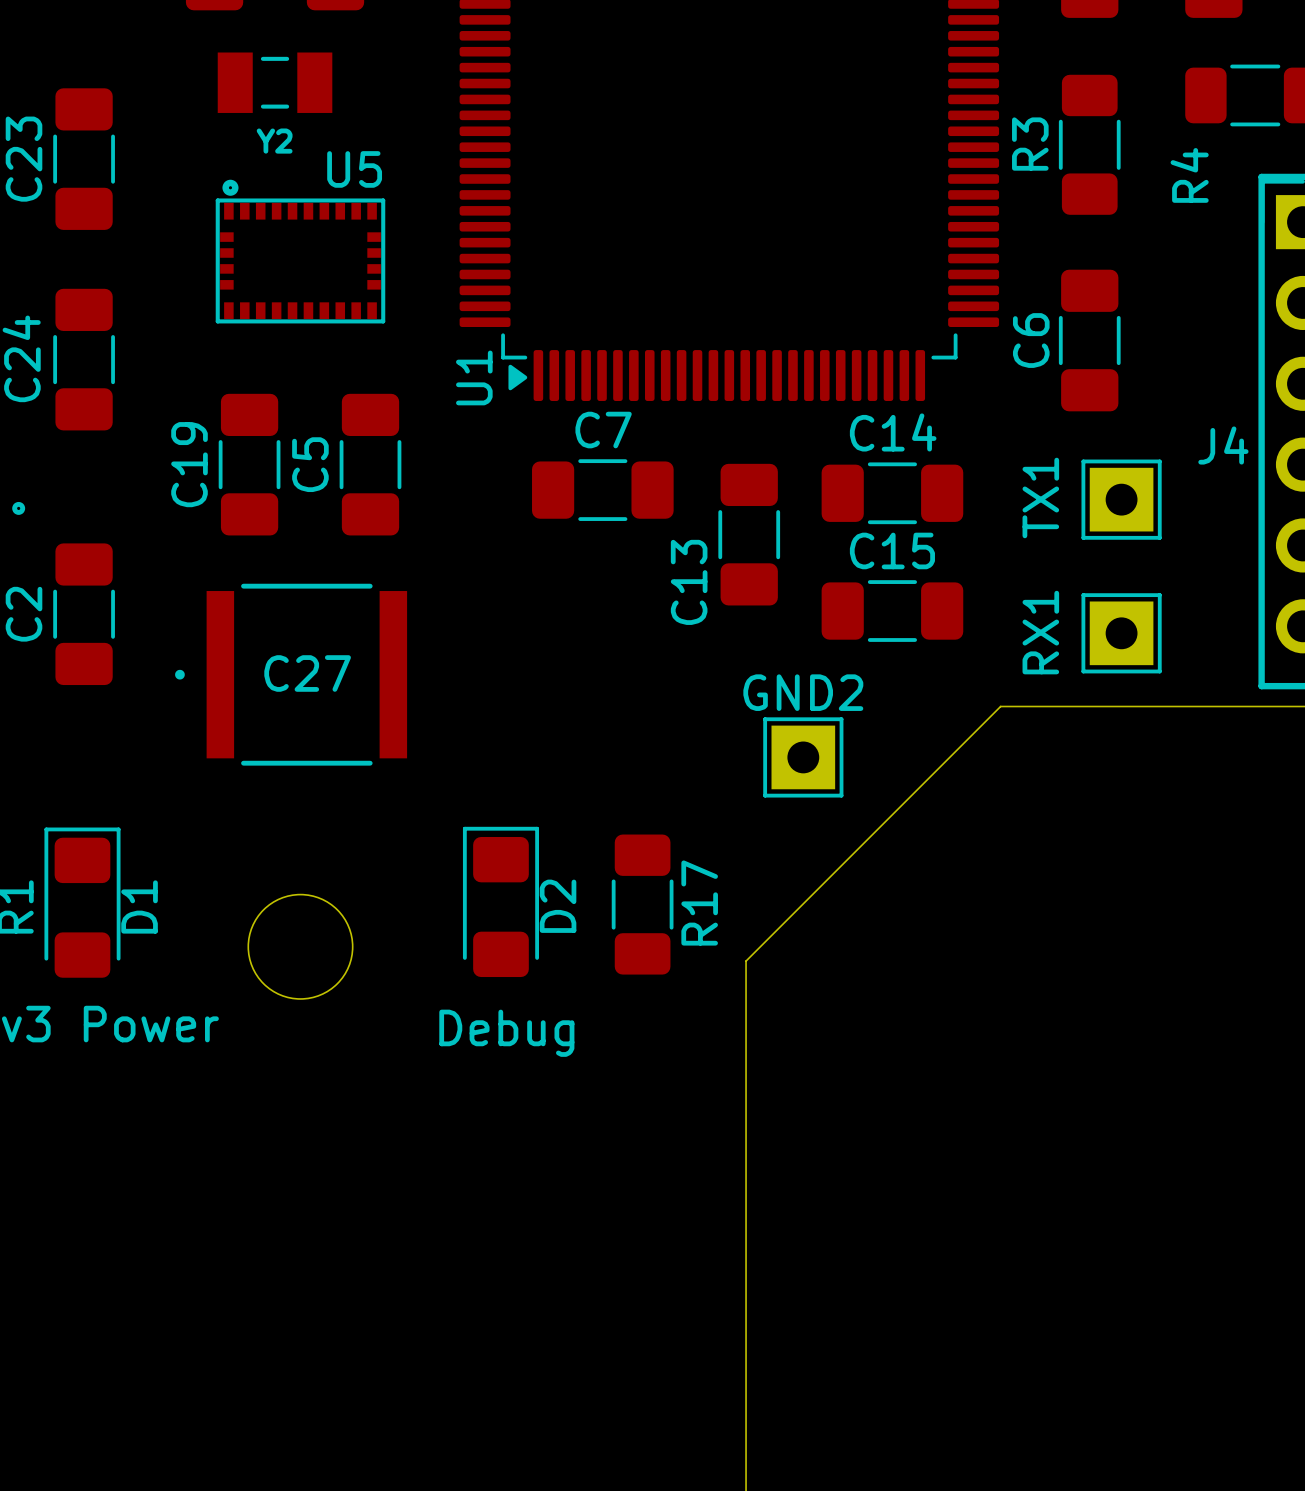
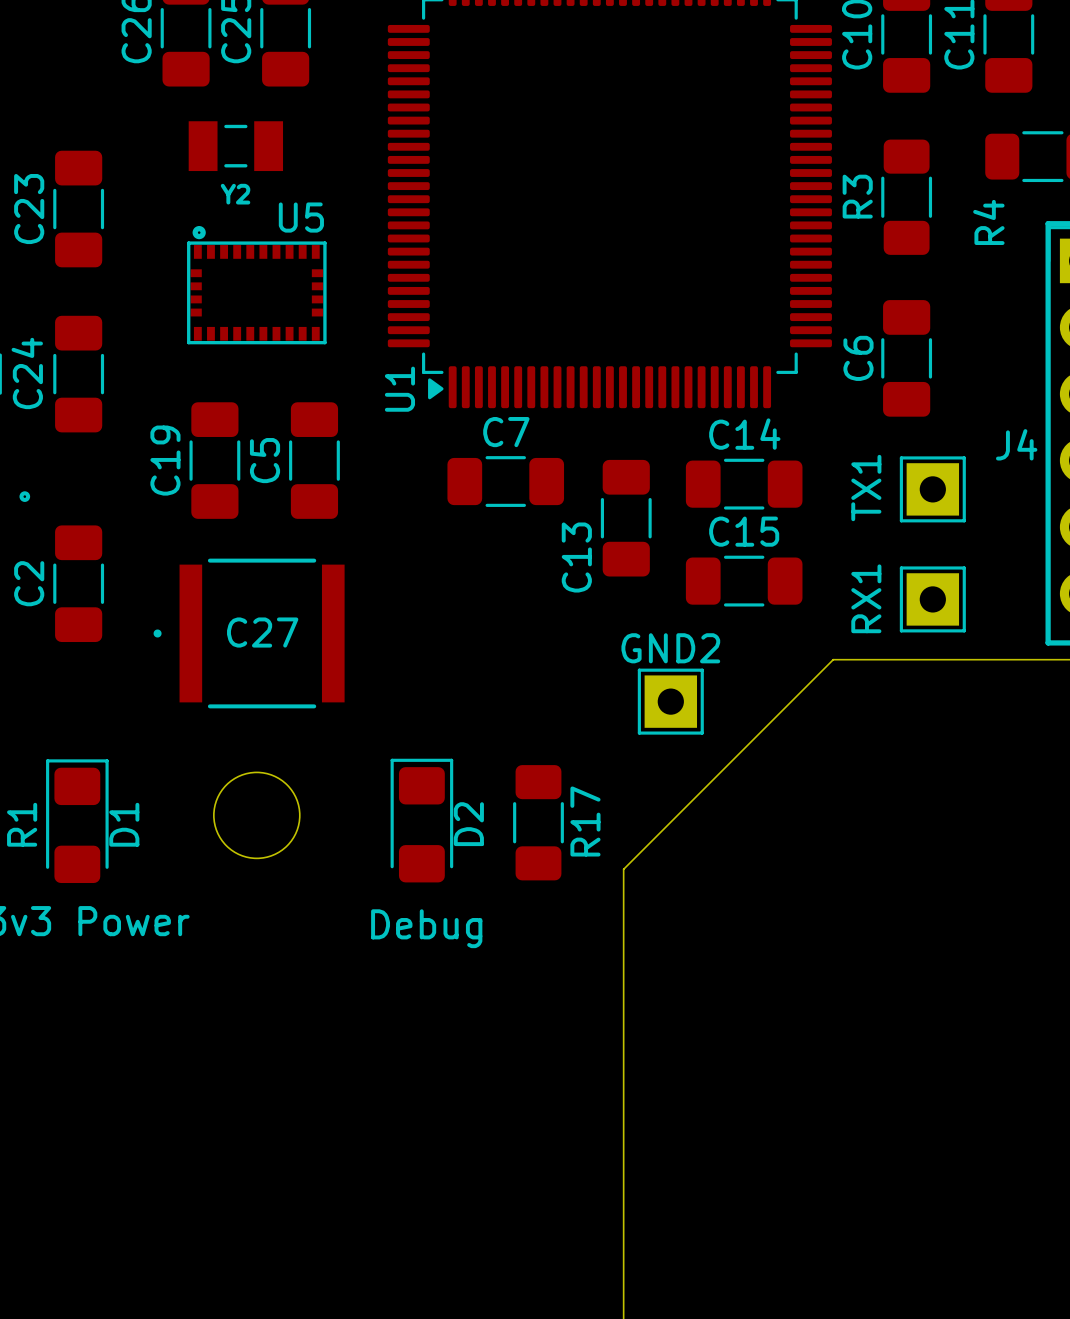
round board edge position: (300, 946) -> (256, 815)

